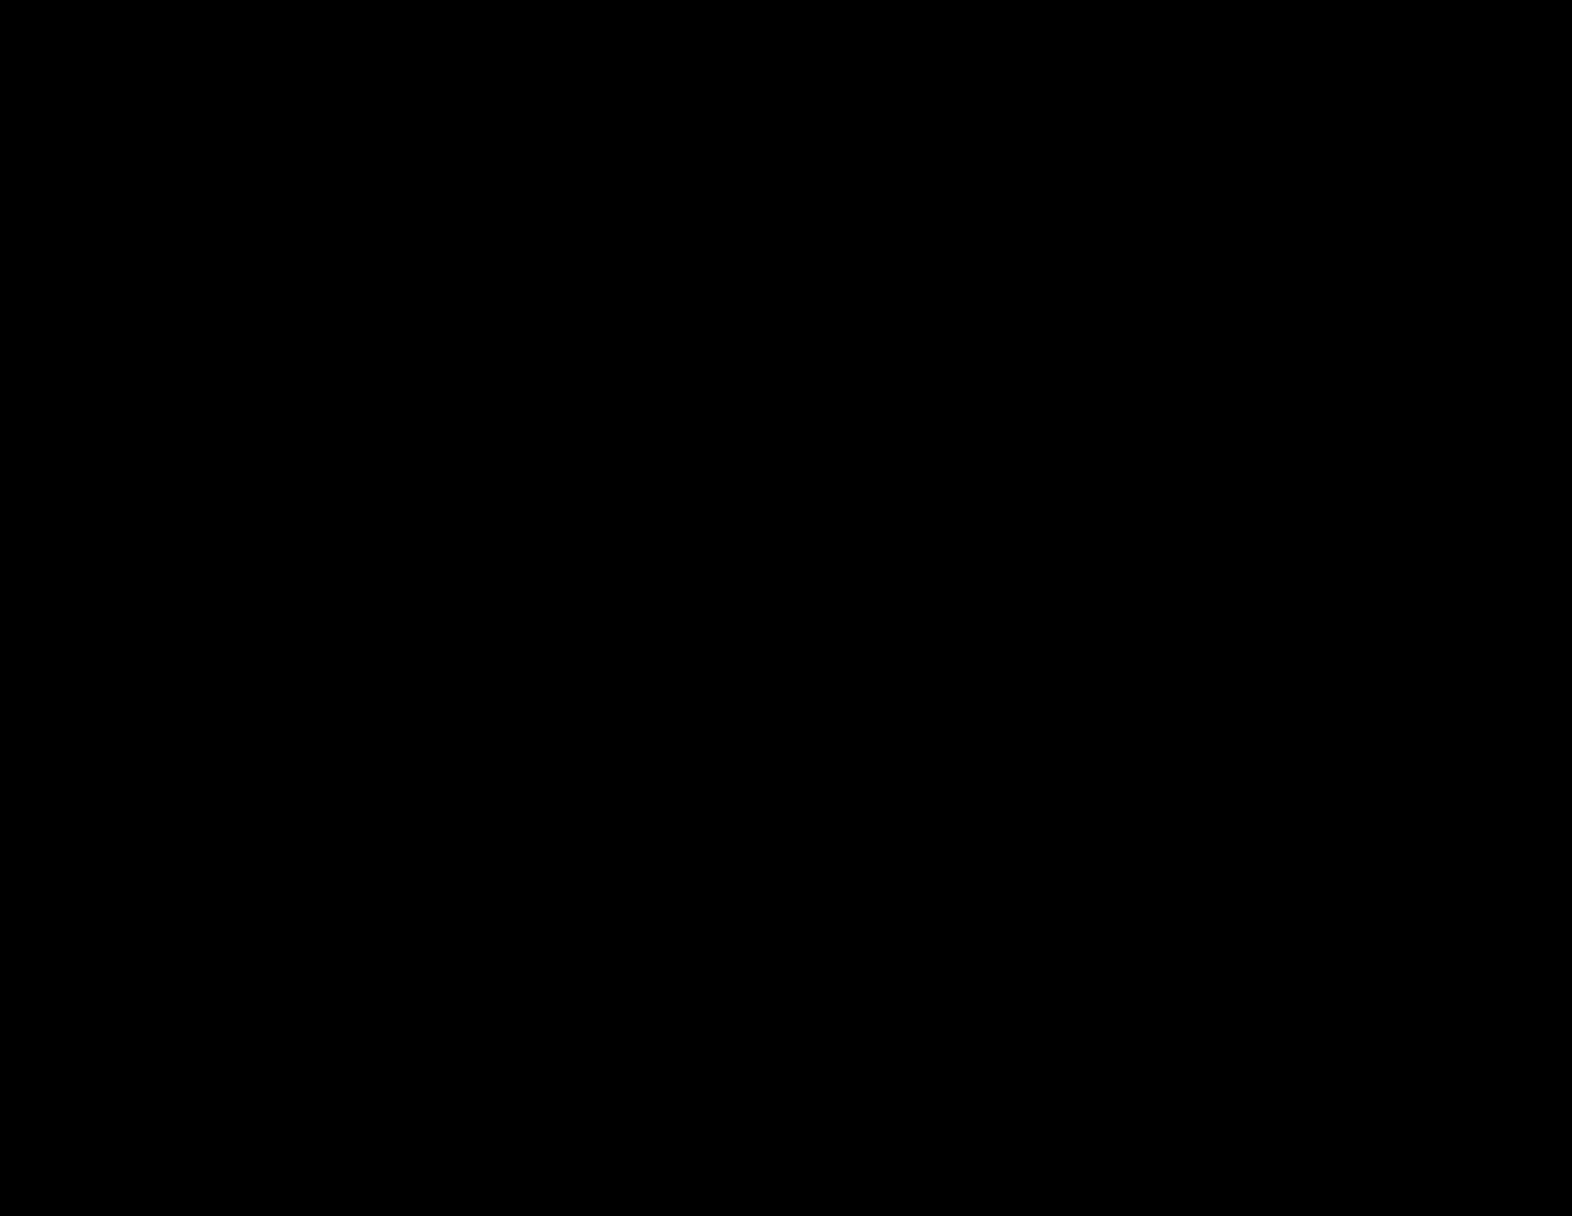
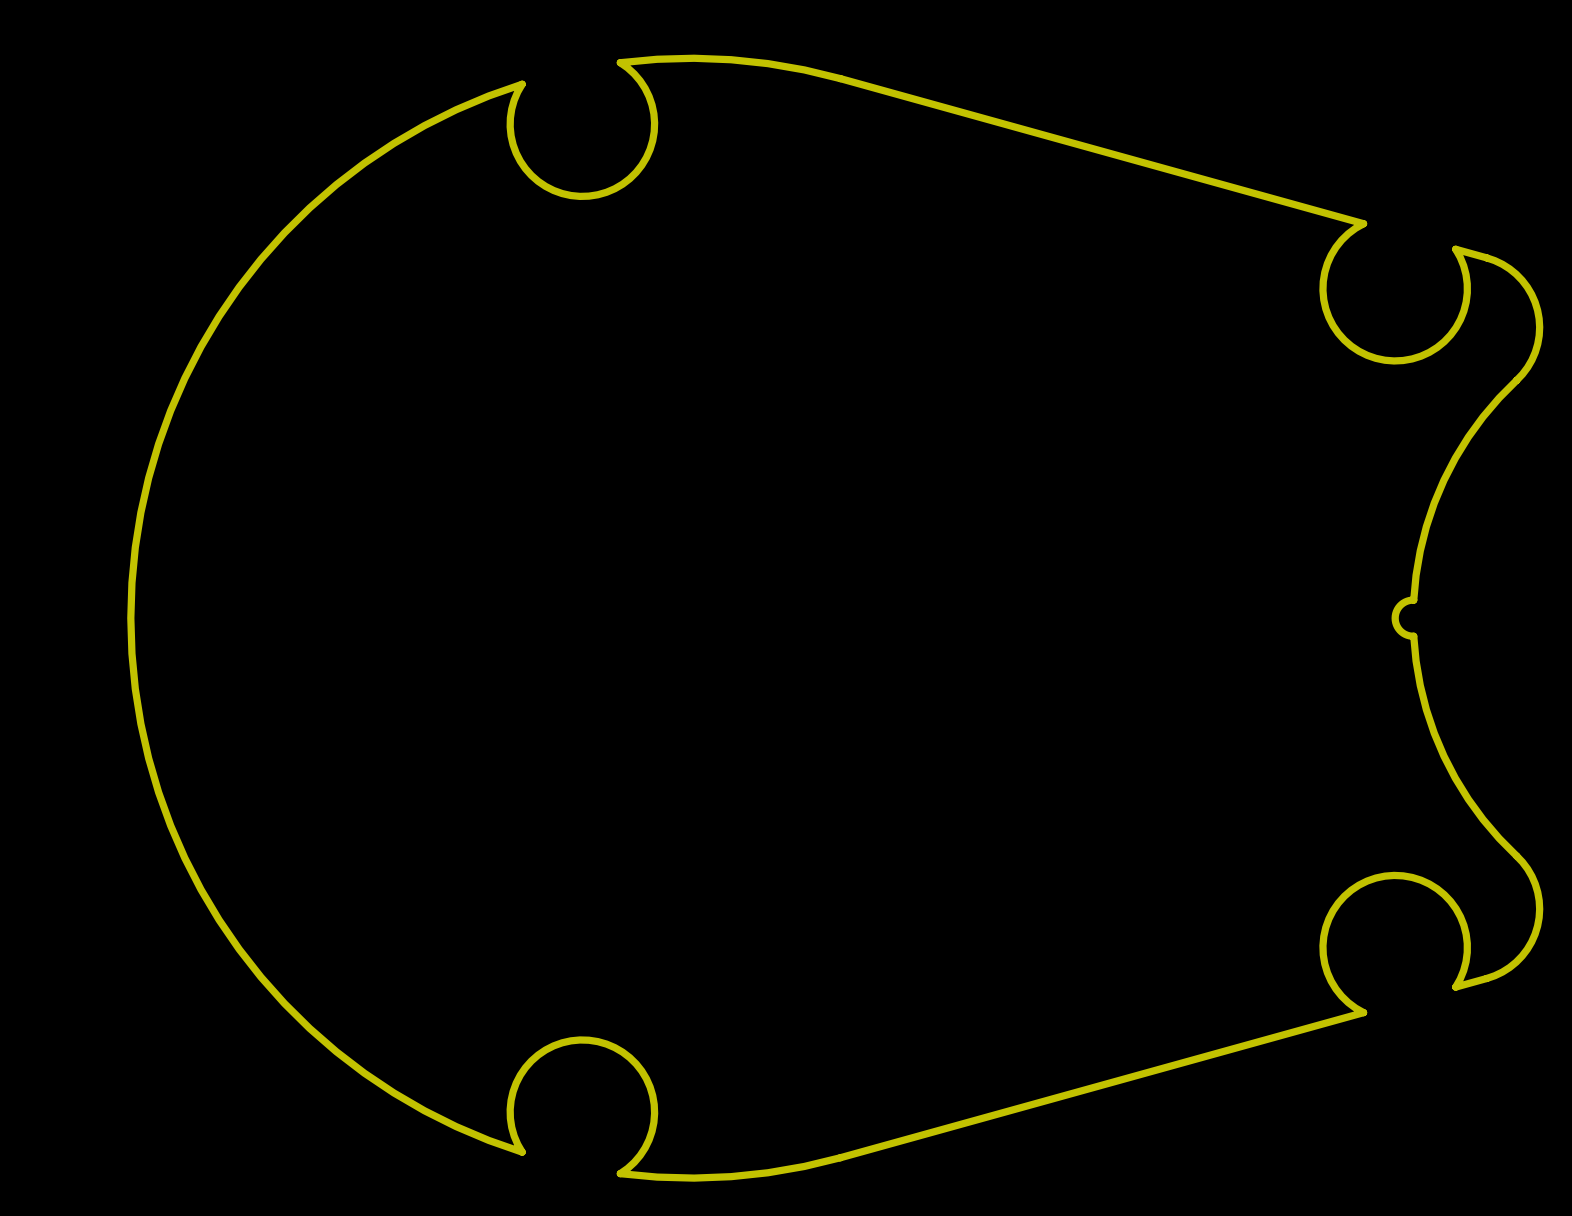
board edge: none -> (620, 62) (694, 58) (767, 63) (804, 69) (1363, 223) (1348, 233) (1335, 247) (1324, 272) (1322, 290) (1328, 317) (1338, 333) (1351, 346) (1375, 358) (1403, 360) (1421, 356) (1444, 341) (1456, 327) (1463, 311) (1467, 283) (1463, 265) (1455, 249) (1494, 260) (1516, 274) (1531, 294) (1537, 310) (1539, 335) (1535, 352) (1522, 374) (1483, 416) (1455, 458) (1443, 480) (1426, 526) (1420, 550) (1413, 600) (1401, 604) (1396, 611) (1395, 618) (1396, 624) (1401, 631) (1413, 636) (1420, 685) (1426, 709) (1443, 756) (1455, 778) (1483, 819) (1522, 862) (1535, 884) (1539, 900) (1537, 926) (1527, 949) (1516, 962) (1494, 975) (1455, 987) (1466, 961) (1467, 943) (1463, 925) (1456, 908) (1437, 888) (1421, 880) (1403, 875) (1375, 878) (1351, 890) (1338, 903) (1325, 927) (1322, 945) (1327, 972) (1335, 989) (1348, 1002) (1363, 1012) (840, 1157) (767, 1172) (694, 1178) (620, 1173) (634, 1162) (645, 1147) (652, 1131) (654, 1104) (650, 1087) (636, 1063) (622, 1052) (606, 1044) (588, 1040) (562, 1042) (545, 1049) (525, 1067) (516, 1083) (510, 1109) (511, 1127) (522, 1152) (456, 1126) (393, 1092) (336, 1051) (284, 1003) (239, 949) (200, 889) (184, 858) (158, 792) (140, 723) (131, 653) (131, 582) (140, 512) (158, 444) (170, 410) (200, 346) (239, 287) (260, 259) (284, 232) (336, 184) (393, 143) (424, 125) (488, 95) (522, 84) (511, 109) (511, 135) (520, 161) (538, 181) (562, 193) (579, 196) (606, 192) (629, 178) (641, 165) (650, 149) (654, 131) (653, 113) (649, 96) (640, 80) (620, 62)

